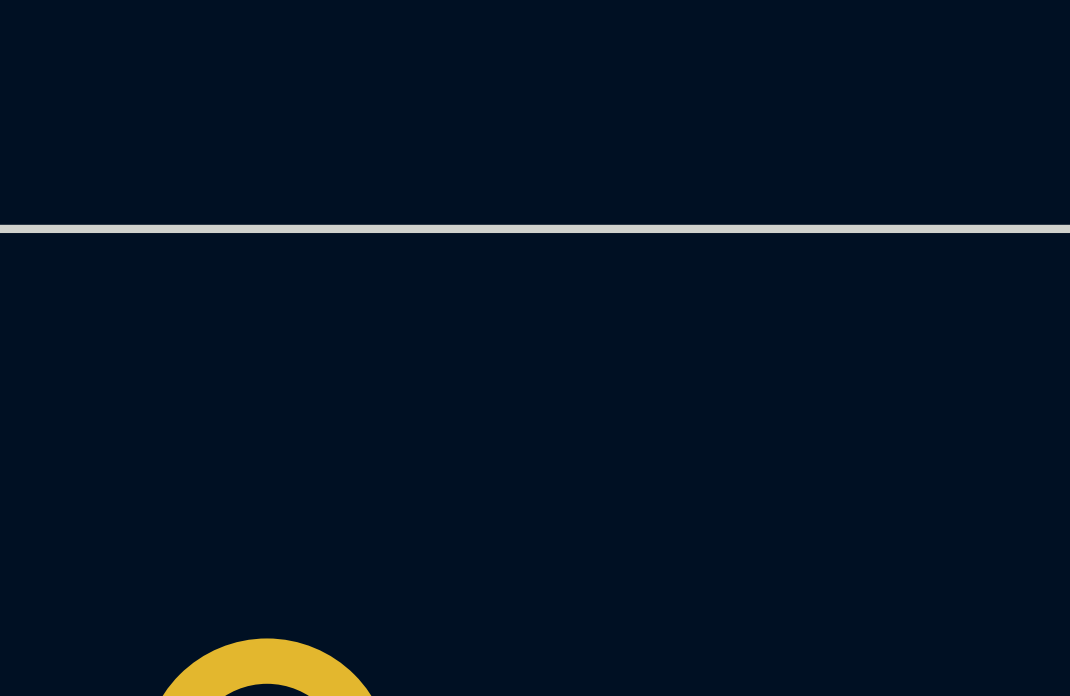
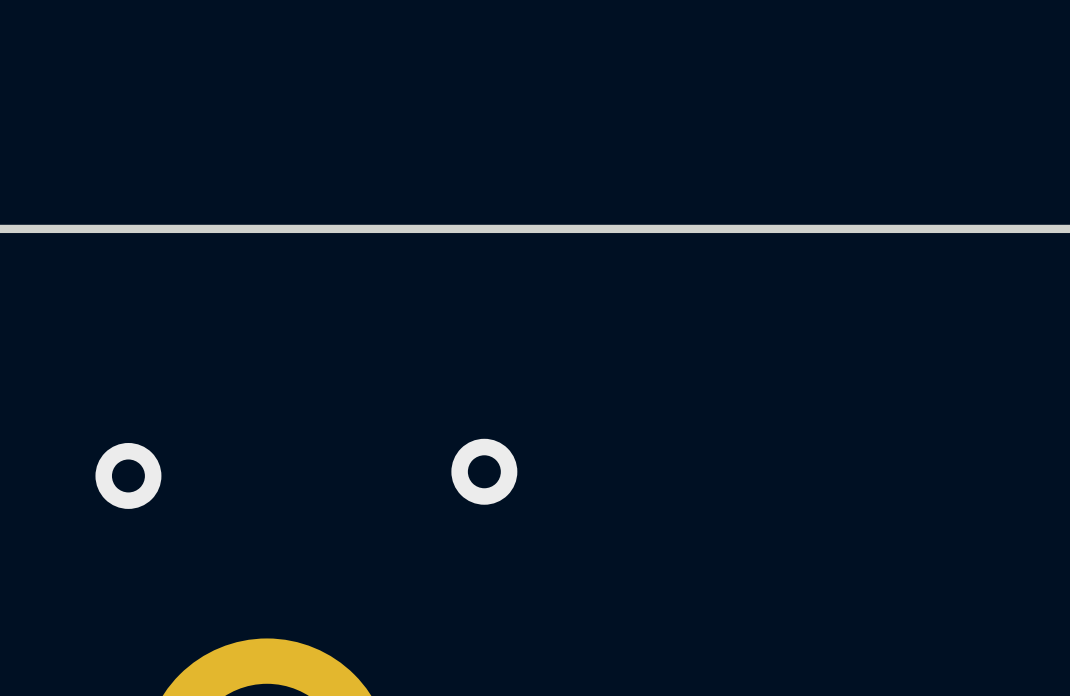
via: none -> (484, 471)
via: none -> (128, 475)

